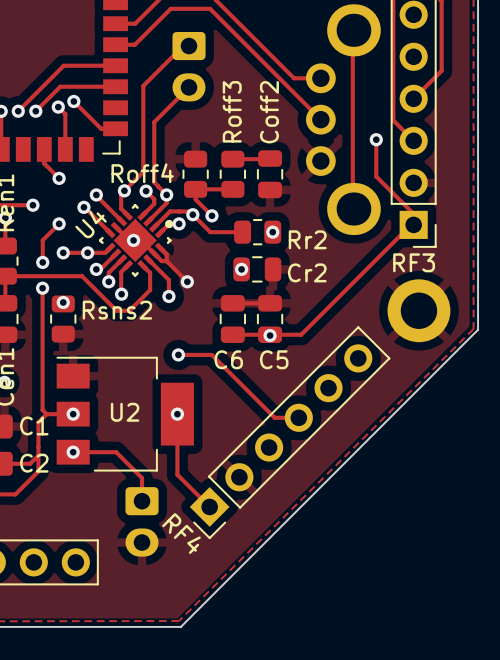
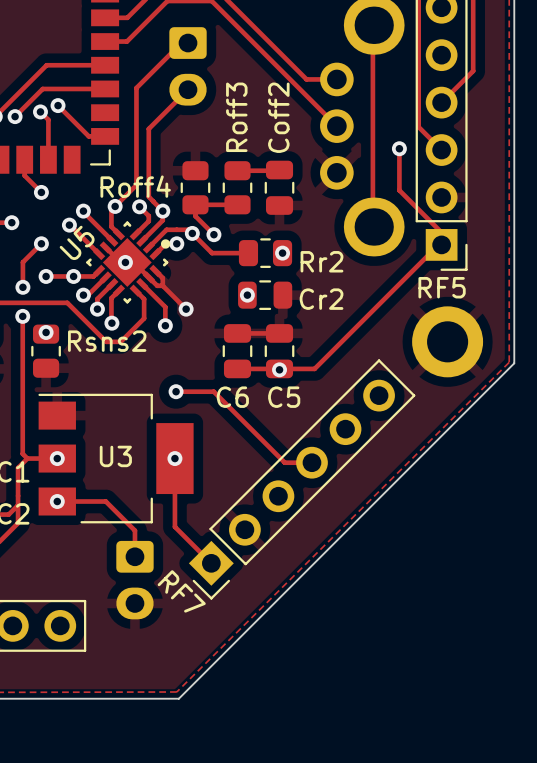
U4 name: U4 (91, 224) -> U5 (77, 242)
RF3 name: RF3 (414, 262) -> RF5 (442, 287)
U2 name: U2 (125, 412) -> U3 (115, 456)
RF4 name: RF4 (181, 533) -> RF7 (181, 591)

